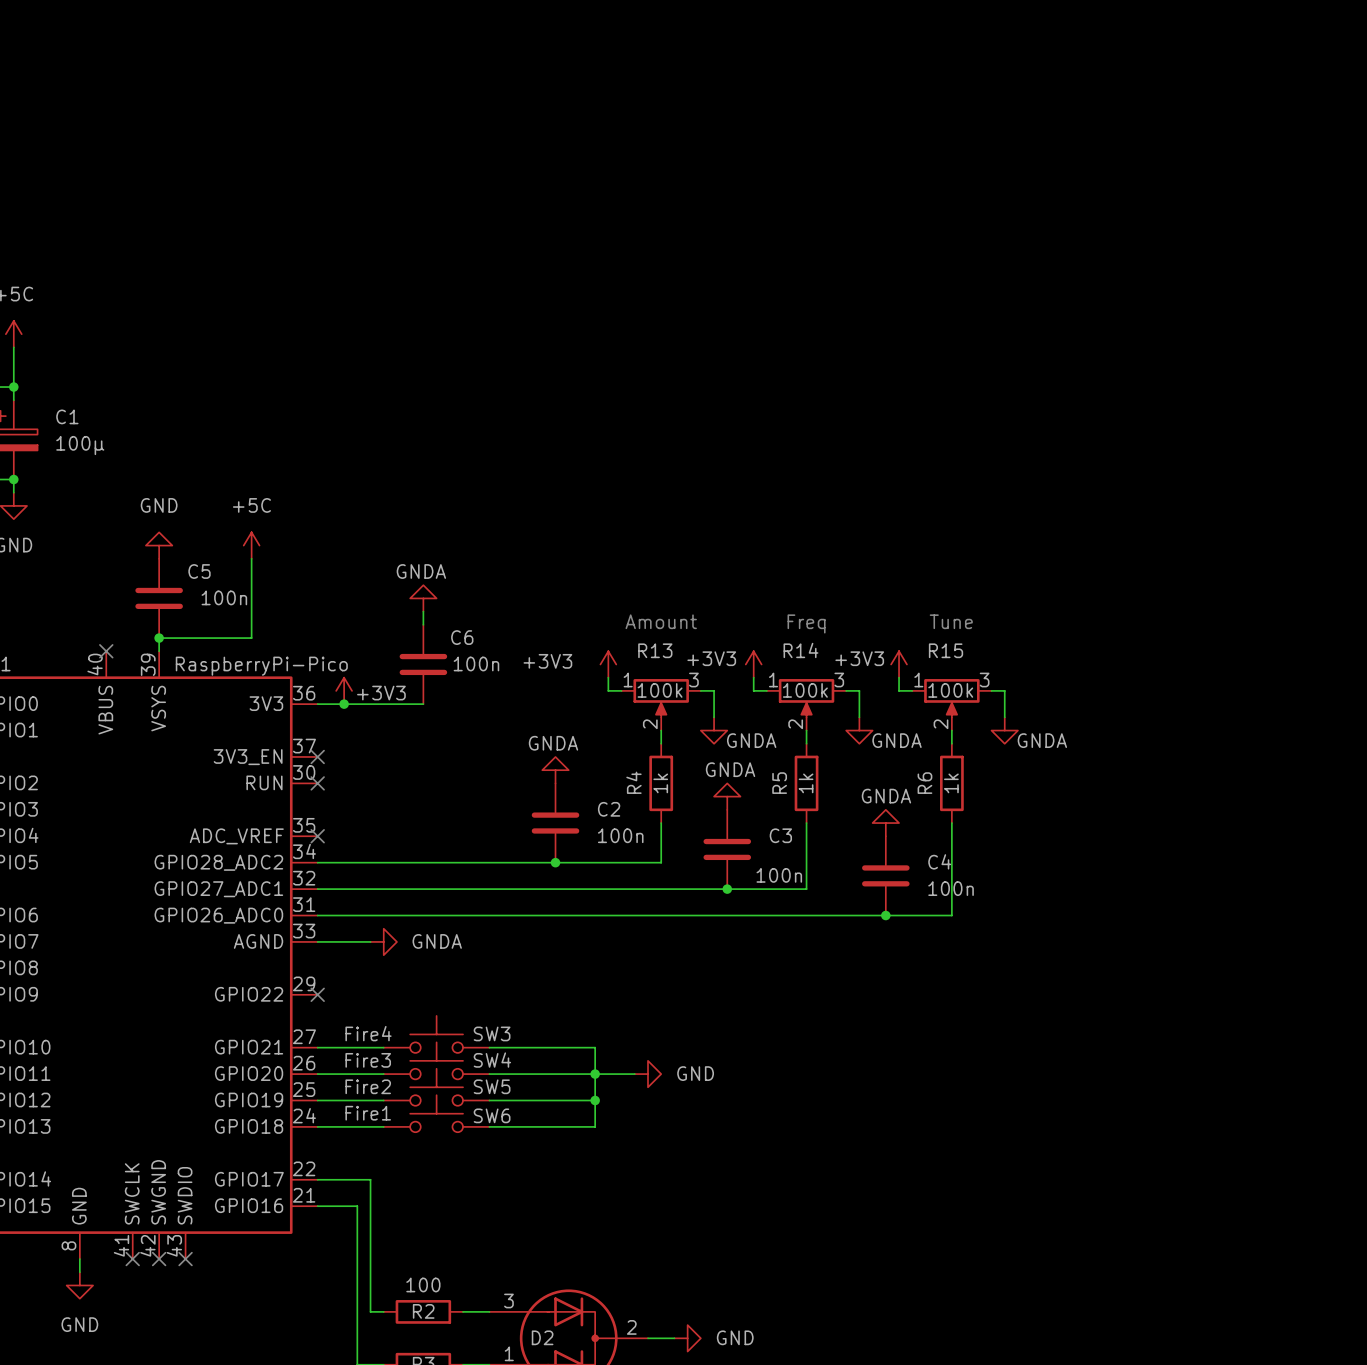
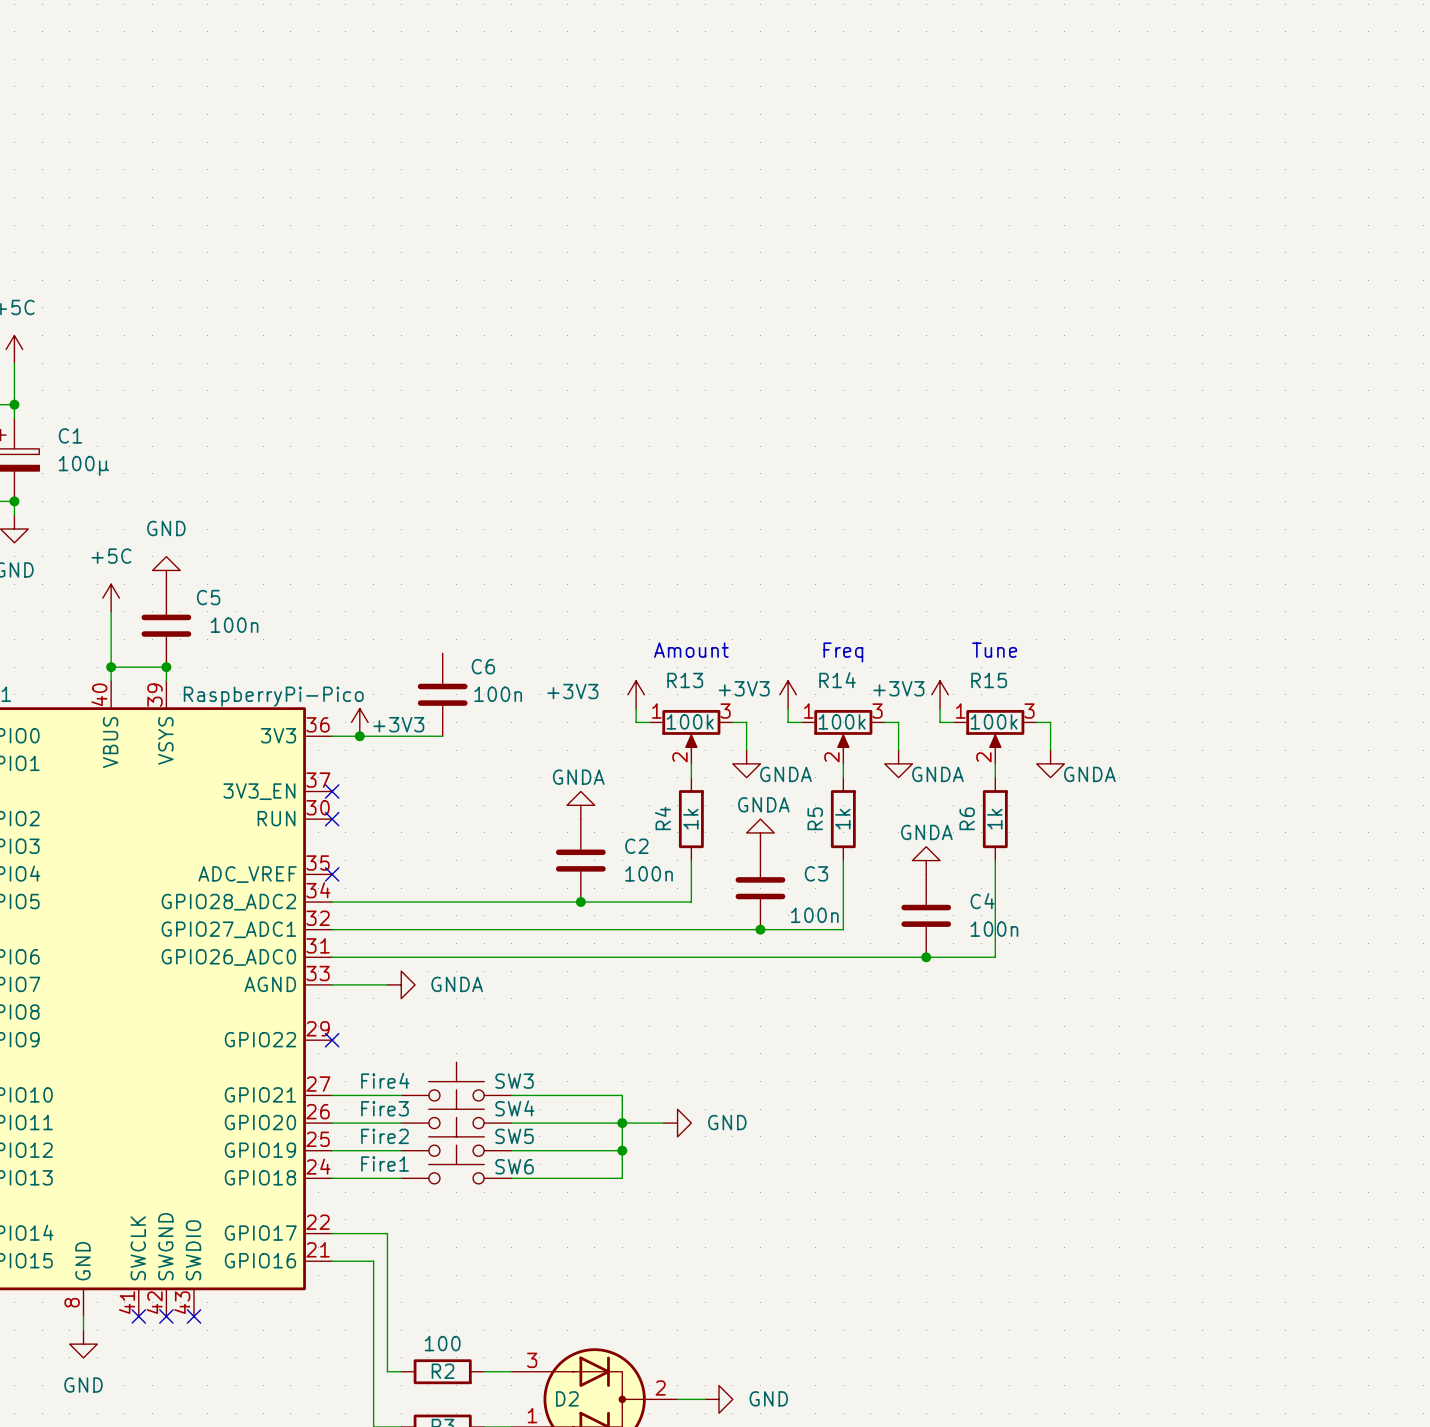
power symbol position: +5C (251, 545) -> +5C (111, 598)
wire: (251, 558) (251, 638) (159, 638) -> (111, 667) (166, 667)
wire: none -> (111, 611) (111, 680)
power symbol: GNDA (423, 598) -> none
wire: (423, 611) (423, 624) -> none
junction: none -> (111, 667)
no-connect mark: (106, 651) -> none

